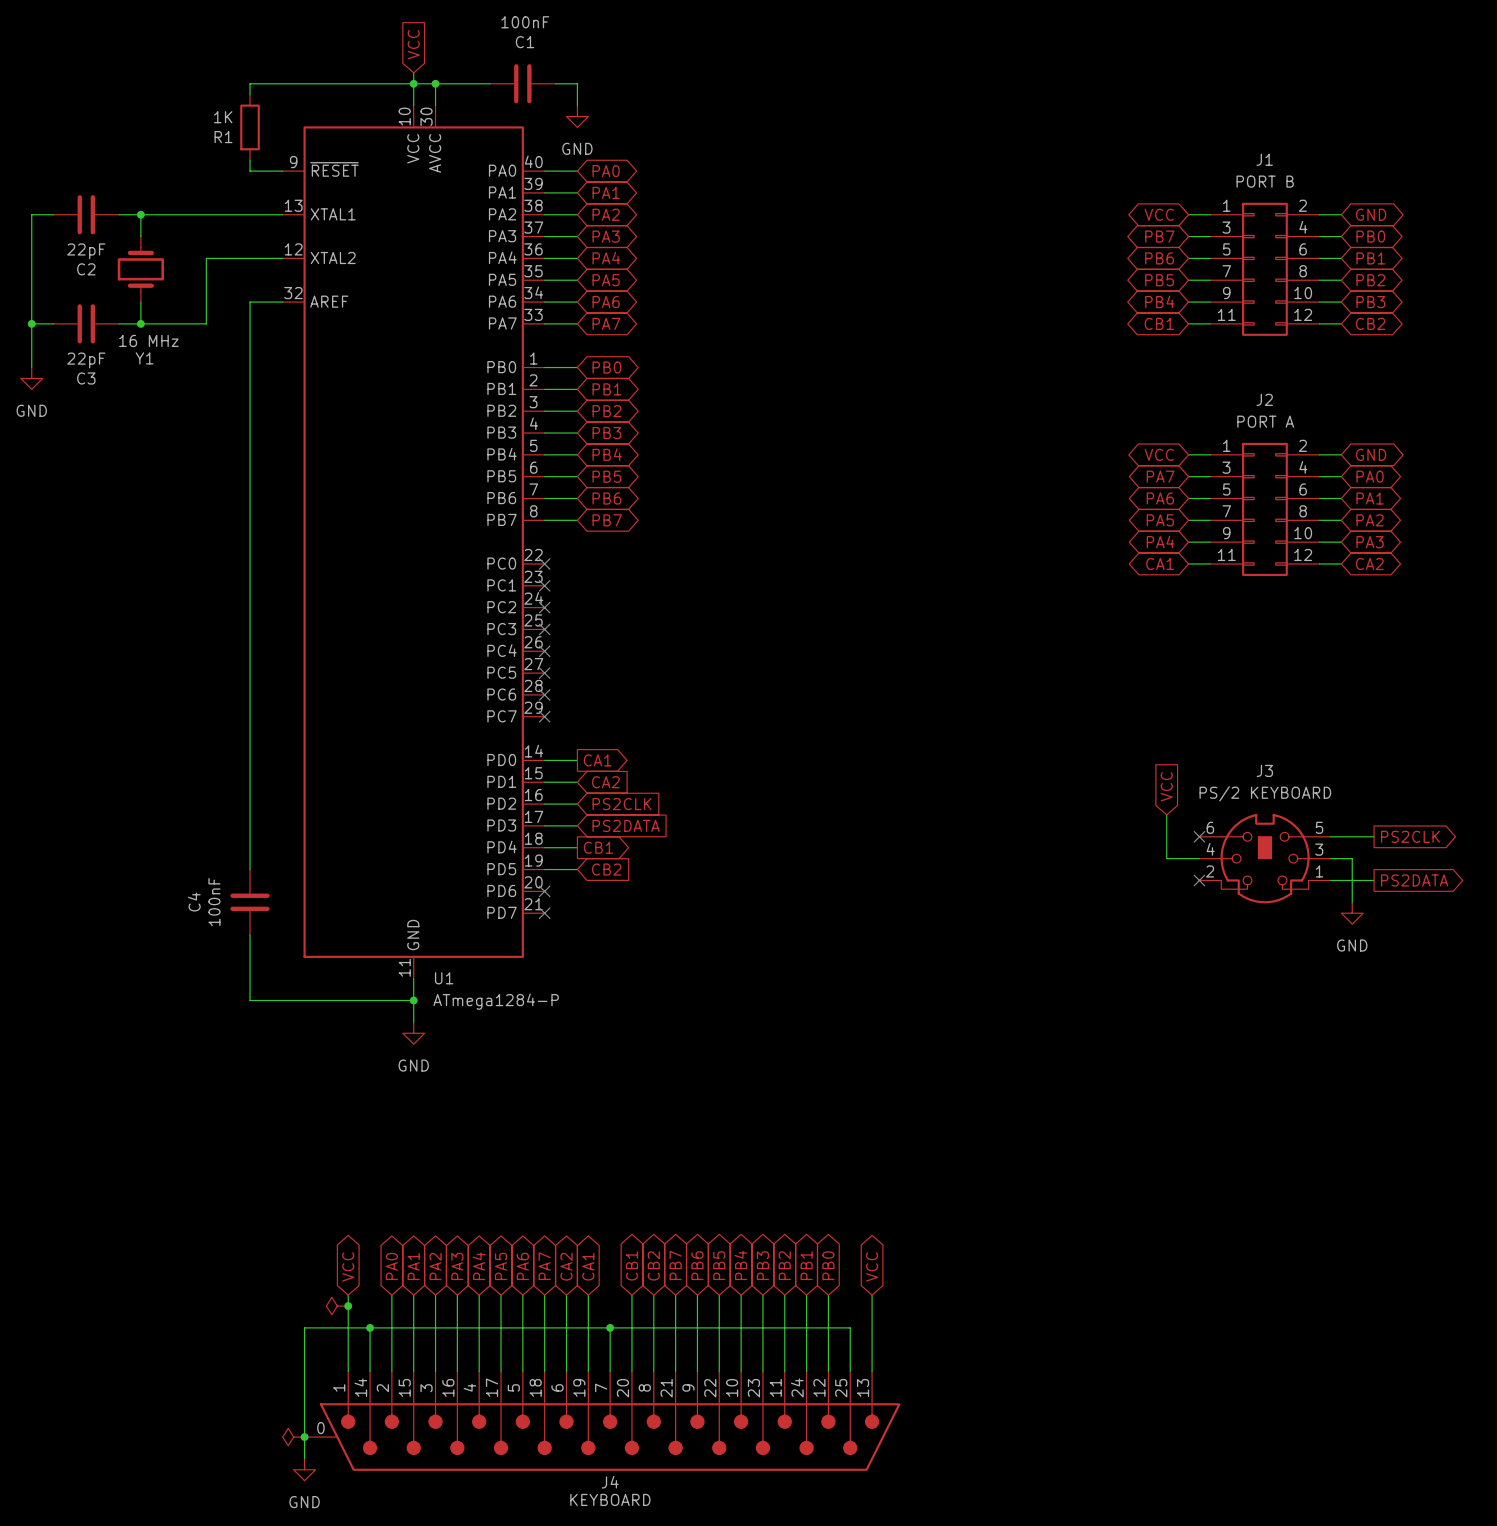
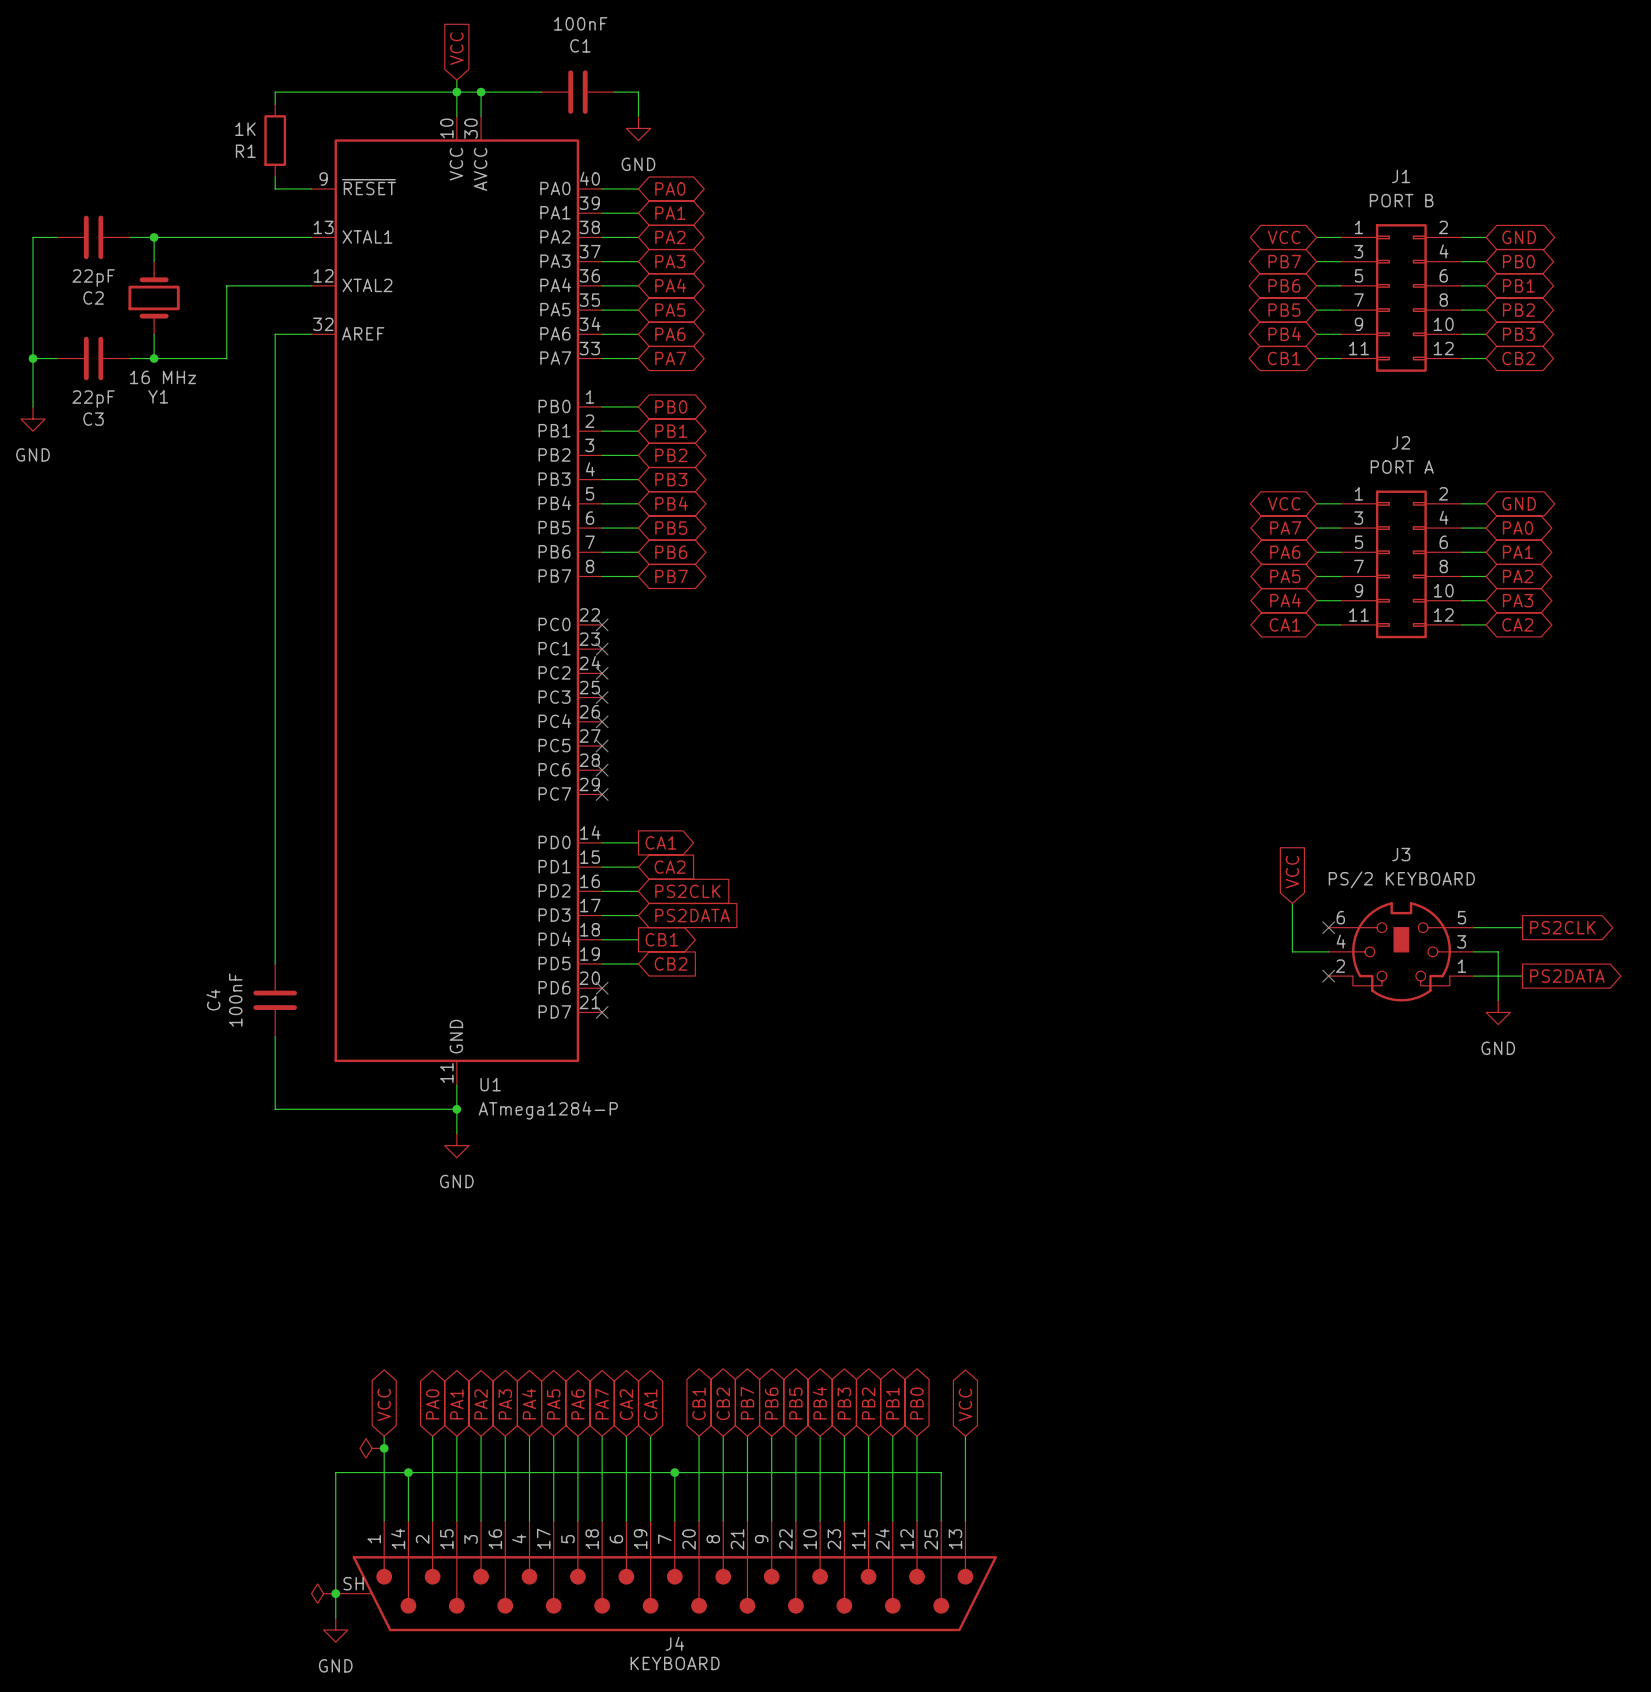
J4 pin number: 0 (320, 1428) -> SH (353, 1583)

